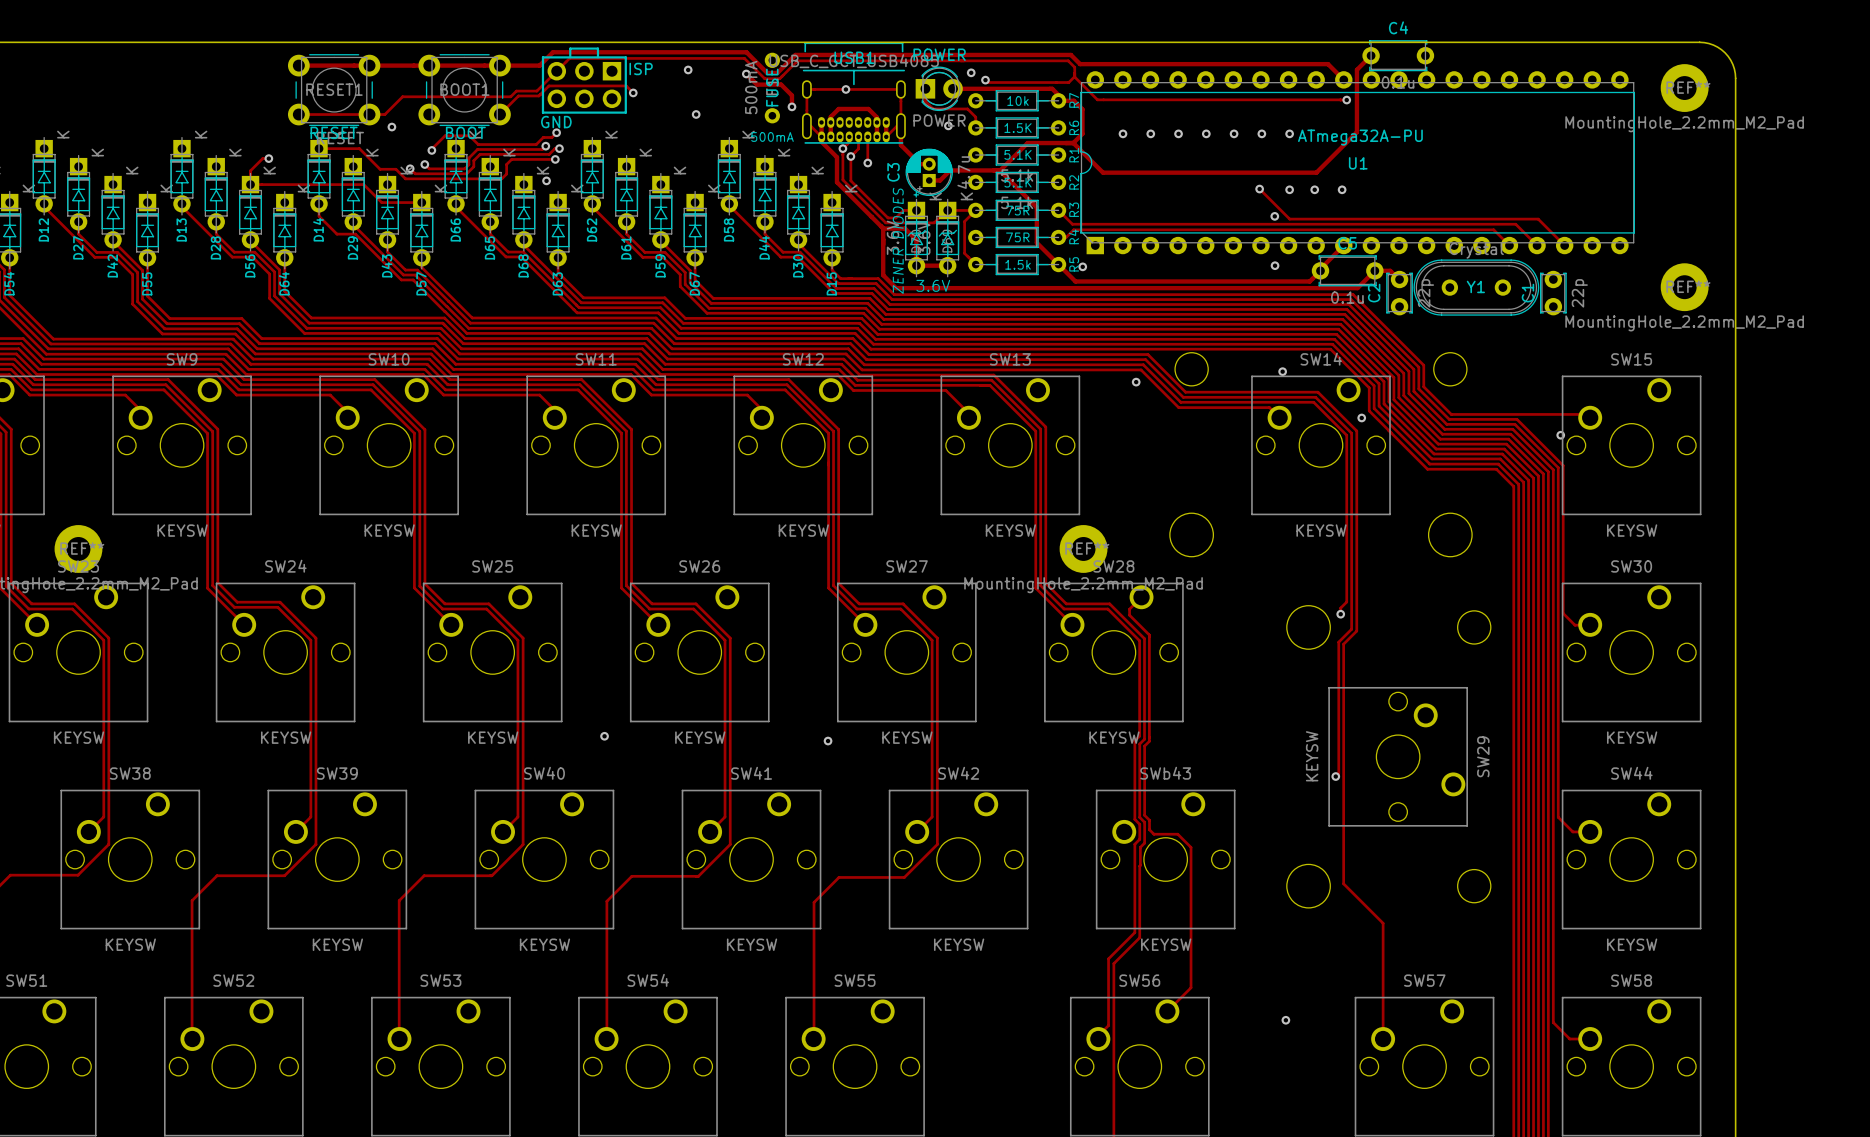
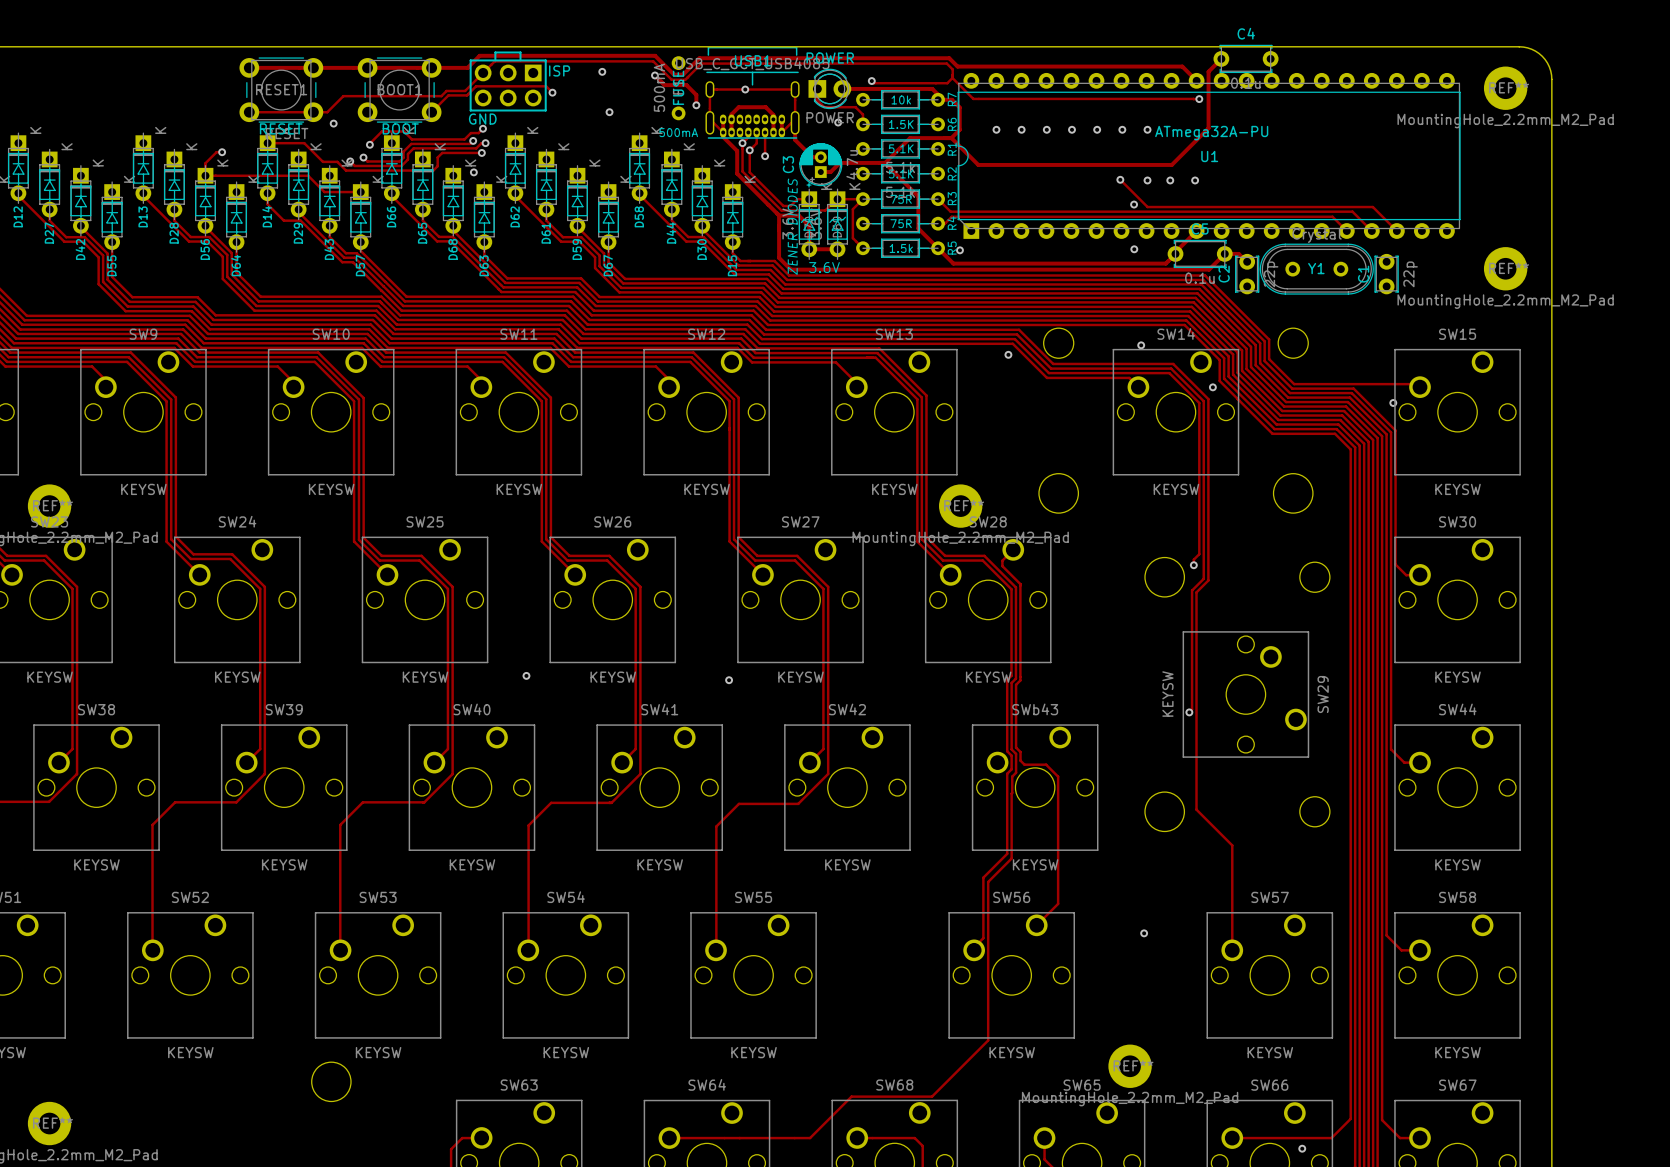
via: (971, 72) -> none

